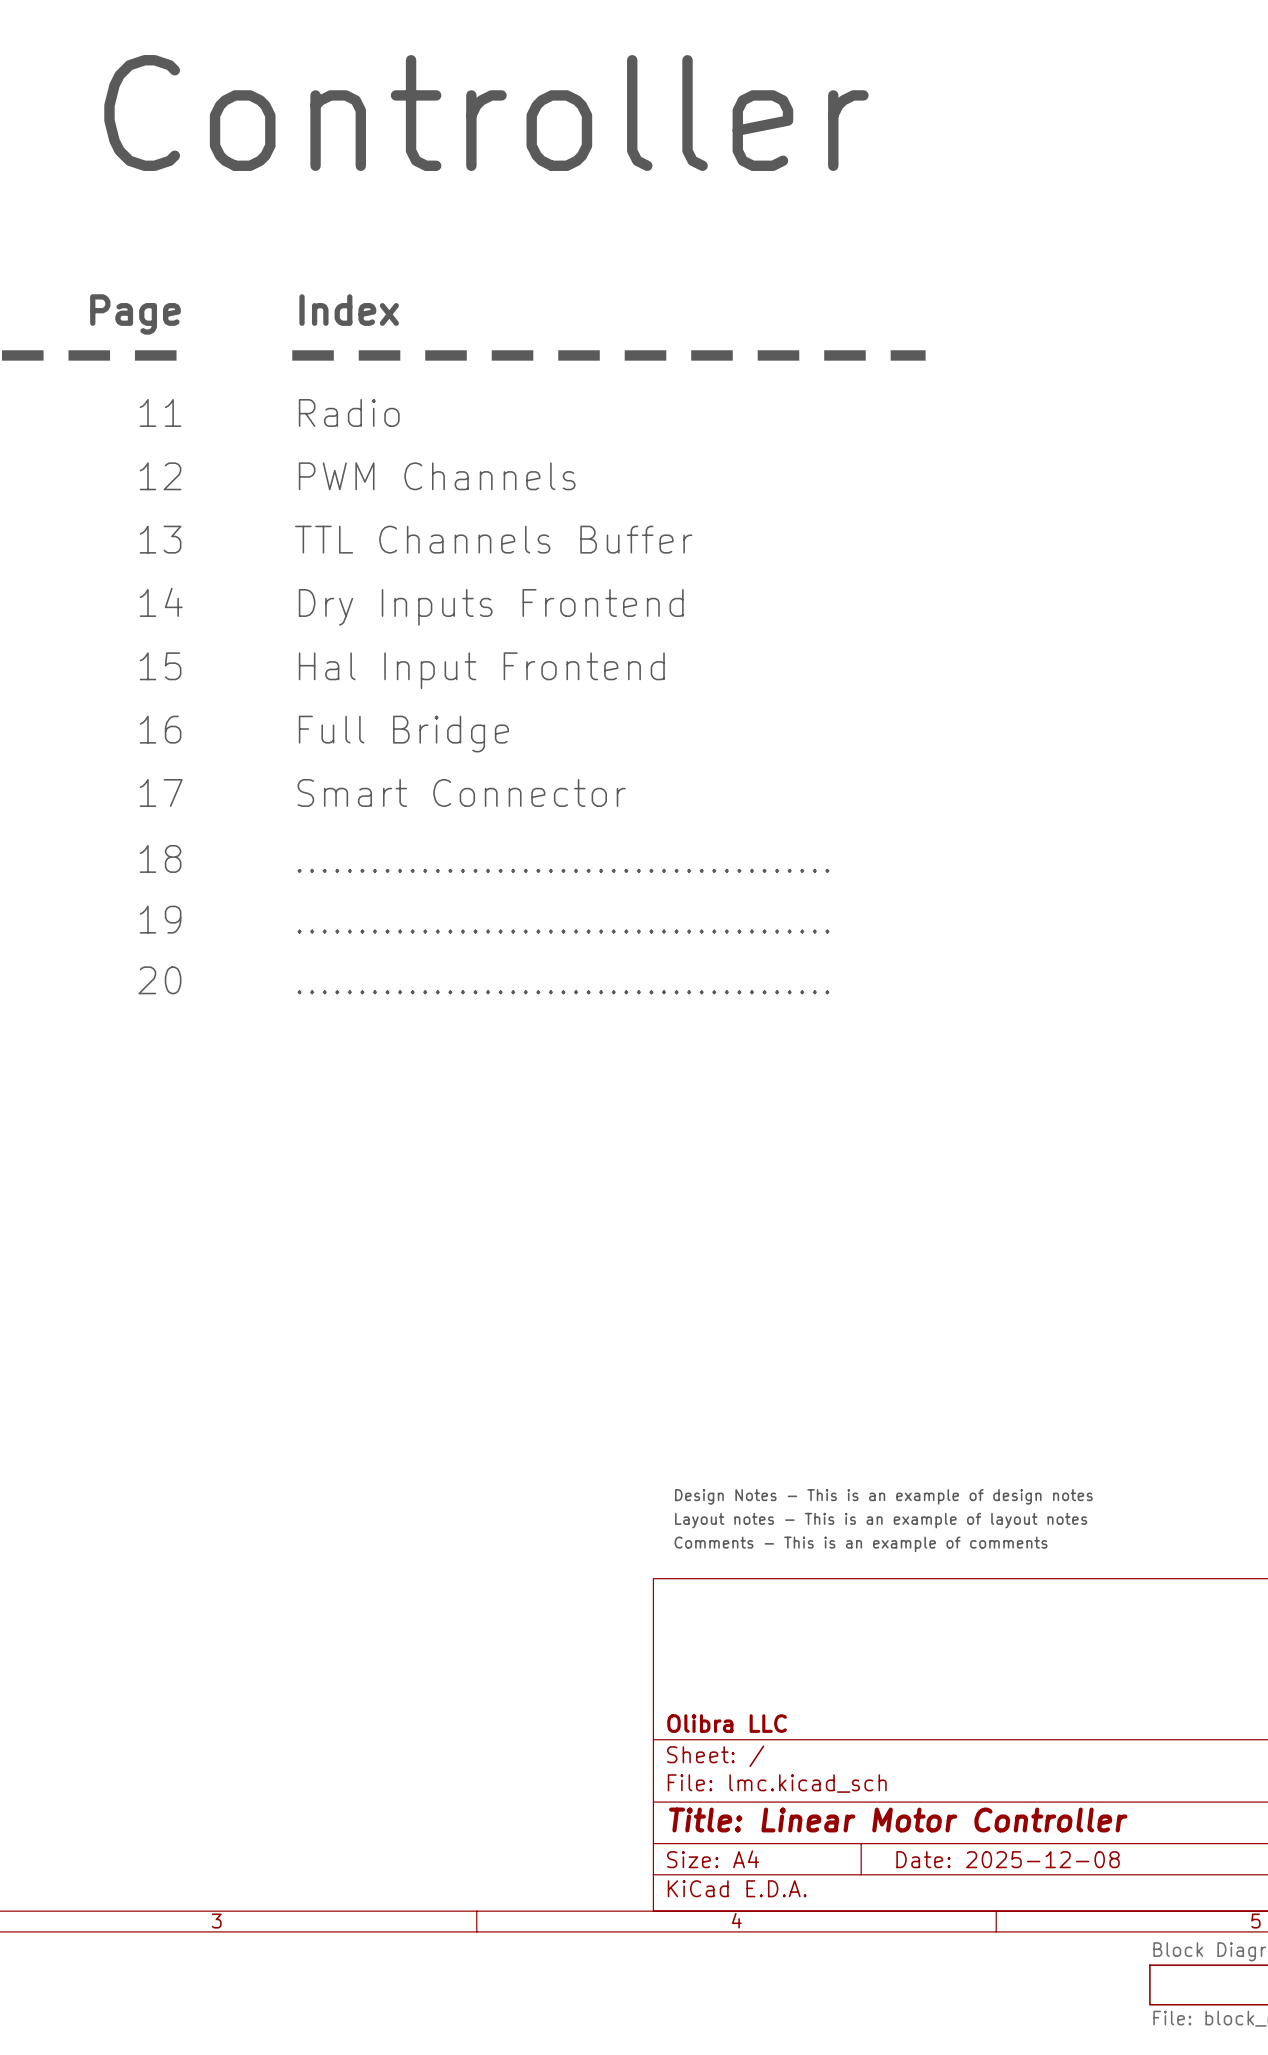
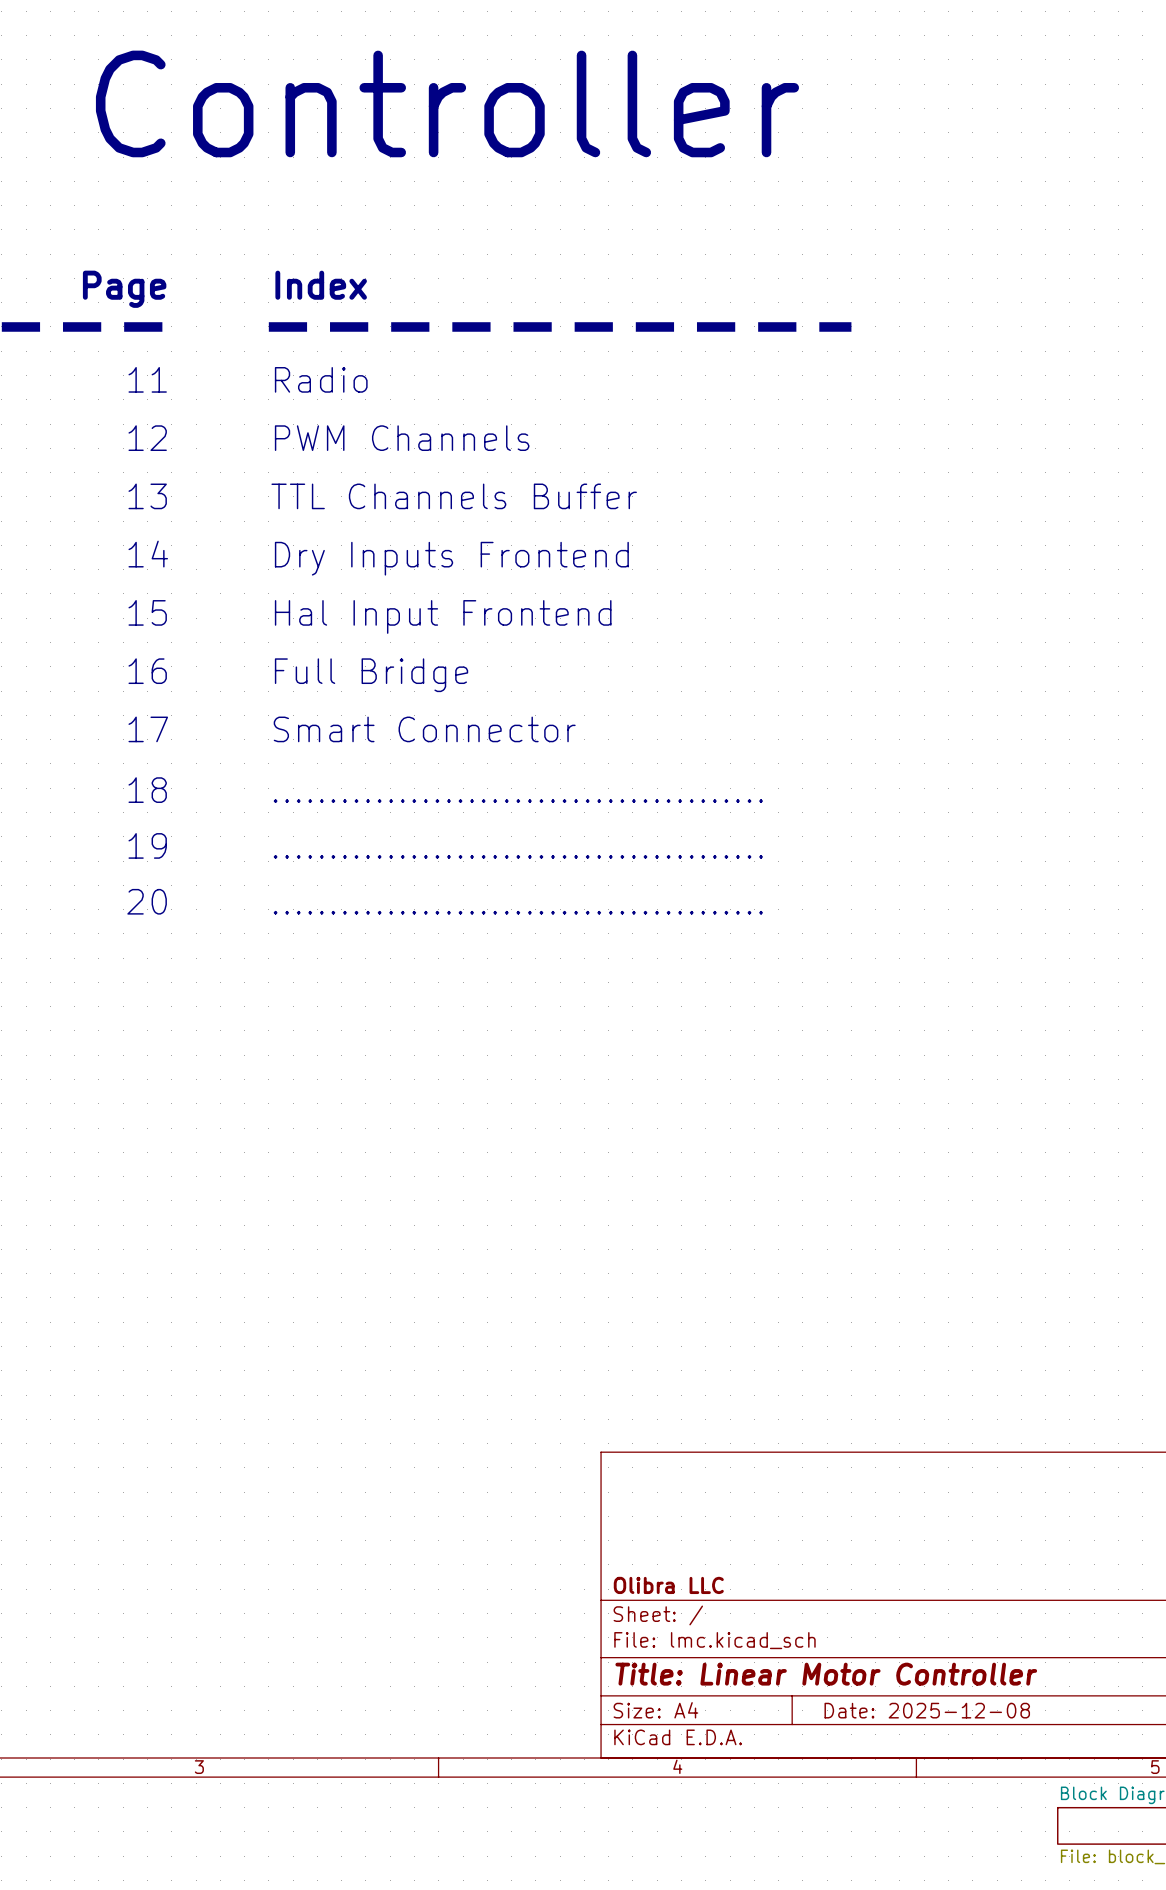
text: Design Notes - This is an example of design notes (883, 1496) -> none
text: Layout notes - This is an example of layout notes (881, 1520) -> none
text: Comments - This is an example of comments (861, 1544) -> none

